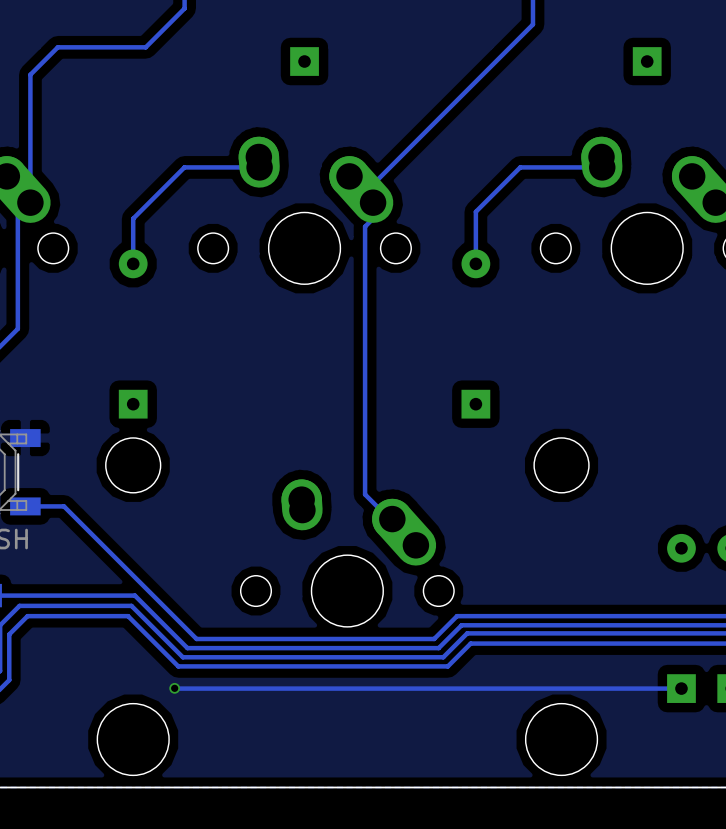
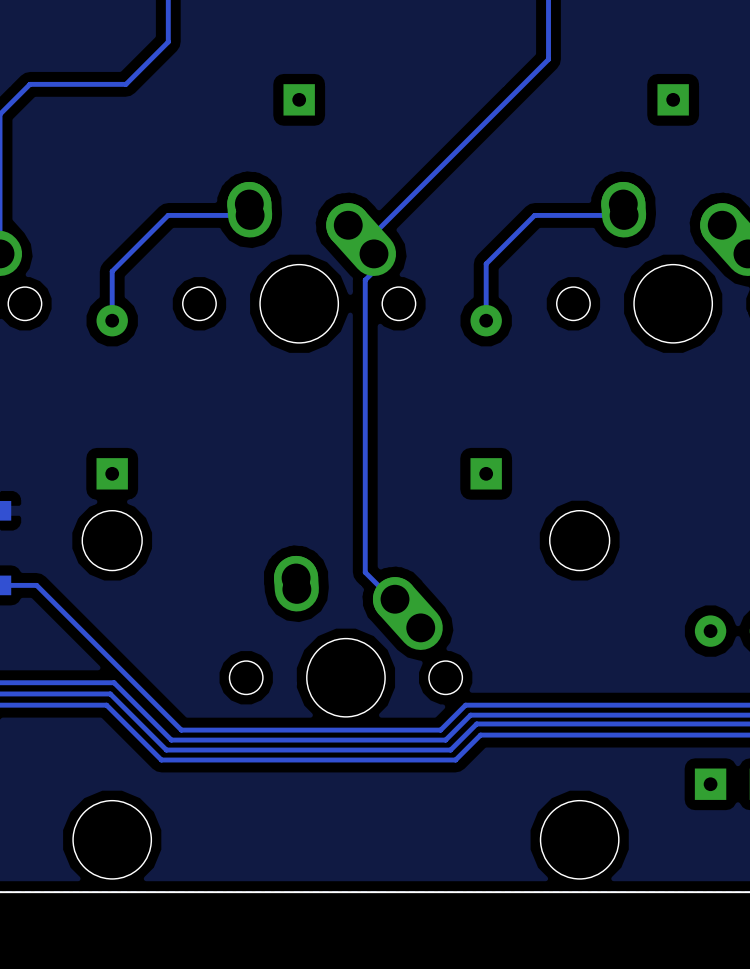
via: (174, 688) -> none
track: (681, 688) (174, 688) -> none

